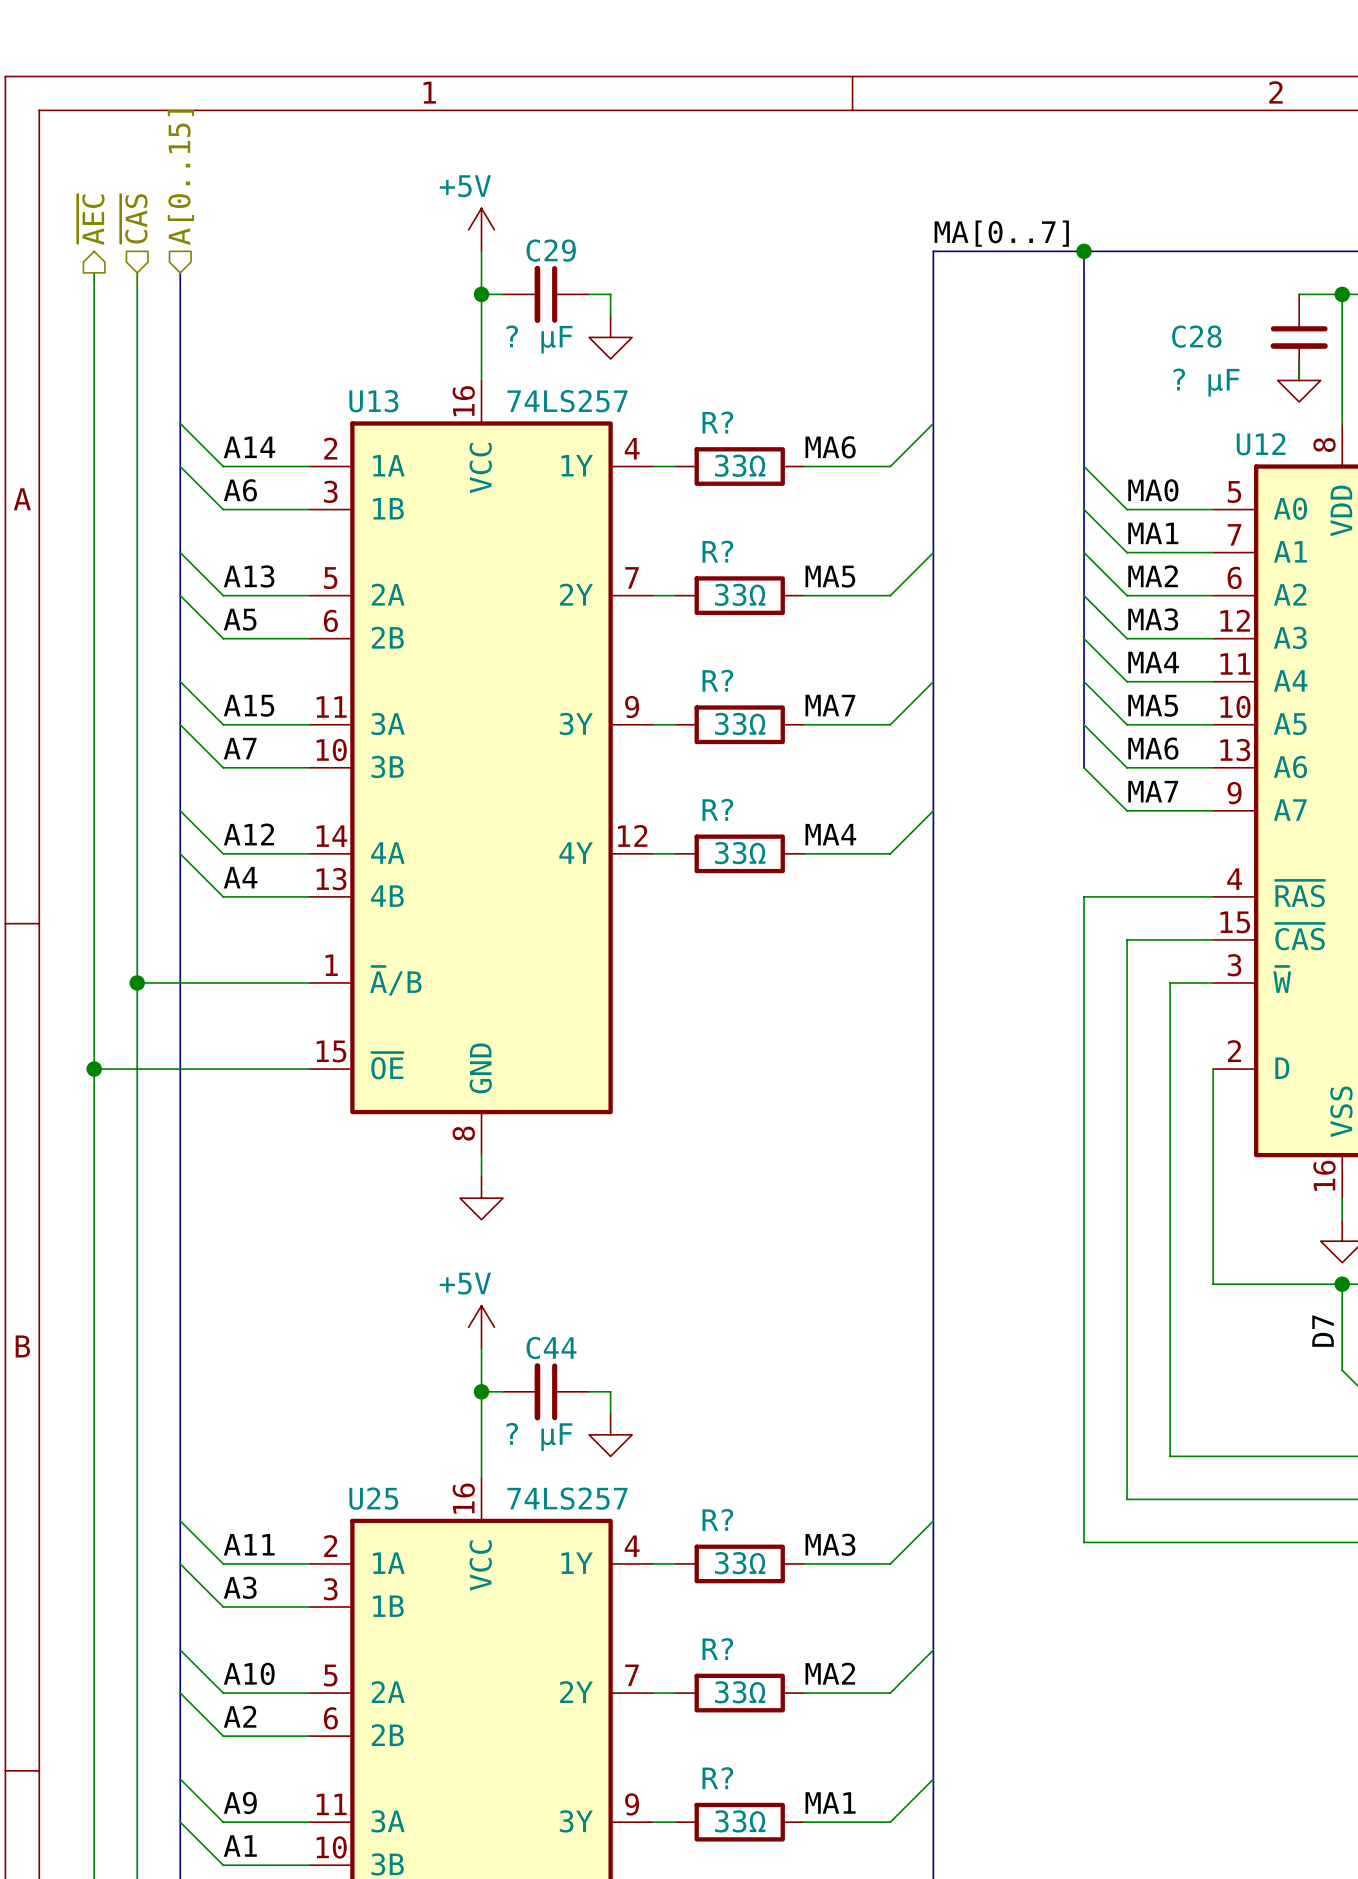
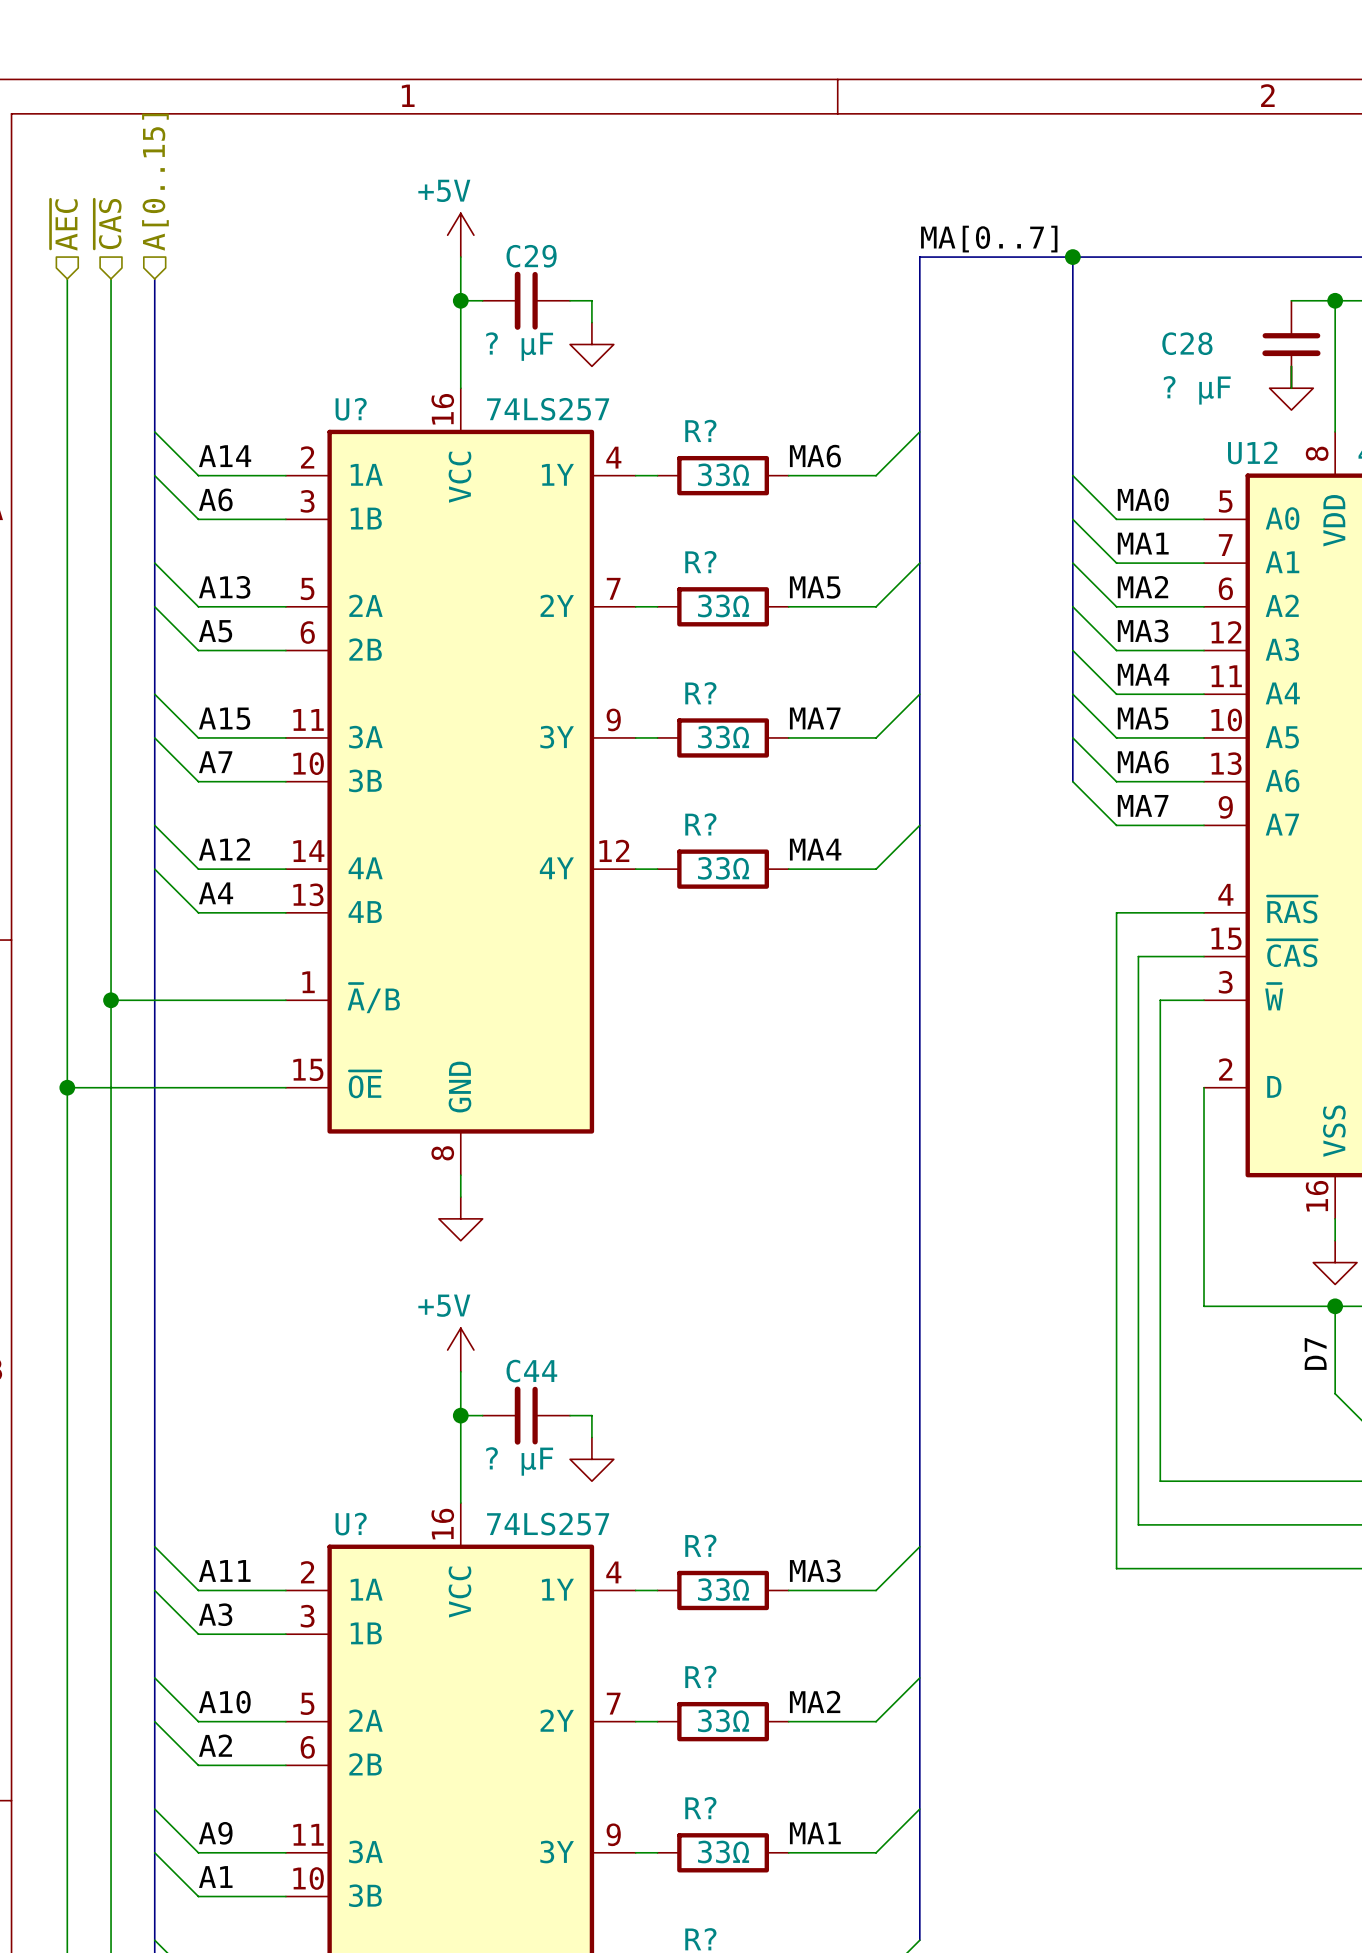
hierarchical label shape: output (91, 219) -> input (64, 224)
U13 name: U13 (373, 401) -> U? (351, 409)
wire: (1127, 896) (1084, 896) (1084, 1542) (1127, 1542) -> none
wire: (1127, 939) (1148, 939) -> (1116, 956) (1116, 912)
wire: none -> (1138, 956) (1138, 1524)
U25 name: U25 (373, 1498) -> U? (351, 1524)
wire: (1127, 1499) (1148, 1499) -> (1116, 1524) (1116, 1568)

